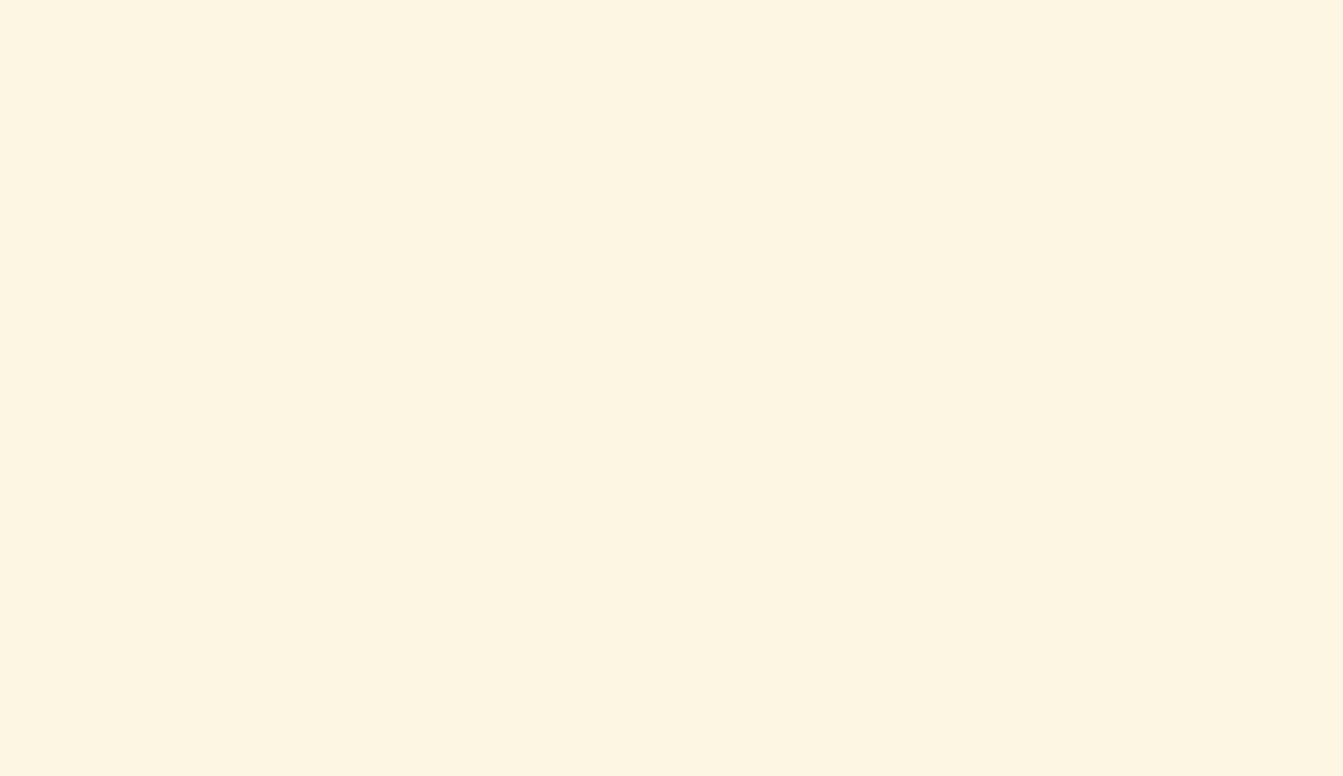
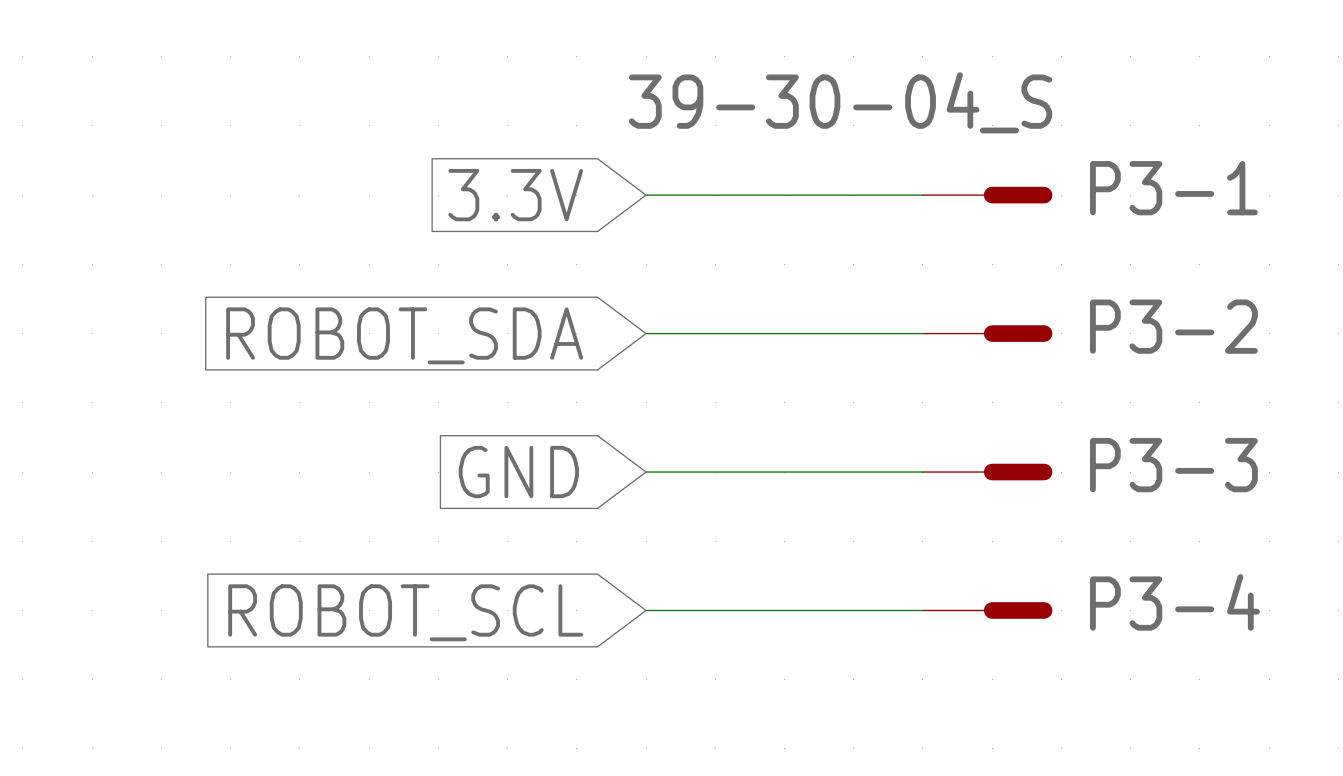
global label: none -> 3.3V (515, 195)
wire: none -> (646, 195) (922, 195)
P3-1: none -> 39-30-04_S (987, 195)
wire: none -> (646, 333) (922, 333)
P3-2: none -> (987, 333)
global label: none -> ROBOT_SDA (404, 335)
global label: none -> GND (518, 472)
wire: none -> (646, 472) (922, 472)
P3-3: none -> (987, 472)
wire: none -> (646, 610) (922, 610)
P3-4: none -> (987, 610)
global label: none -> ROBOT_SCL (405, 612)

